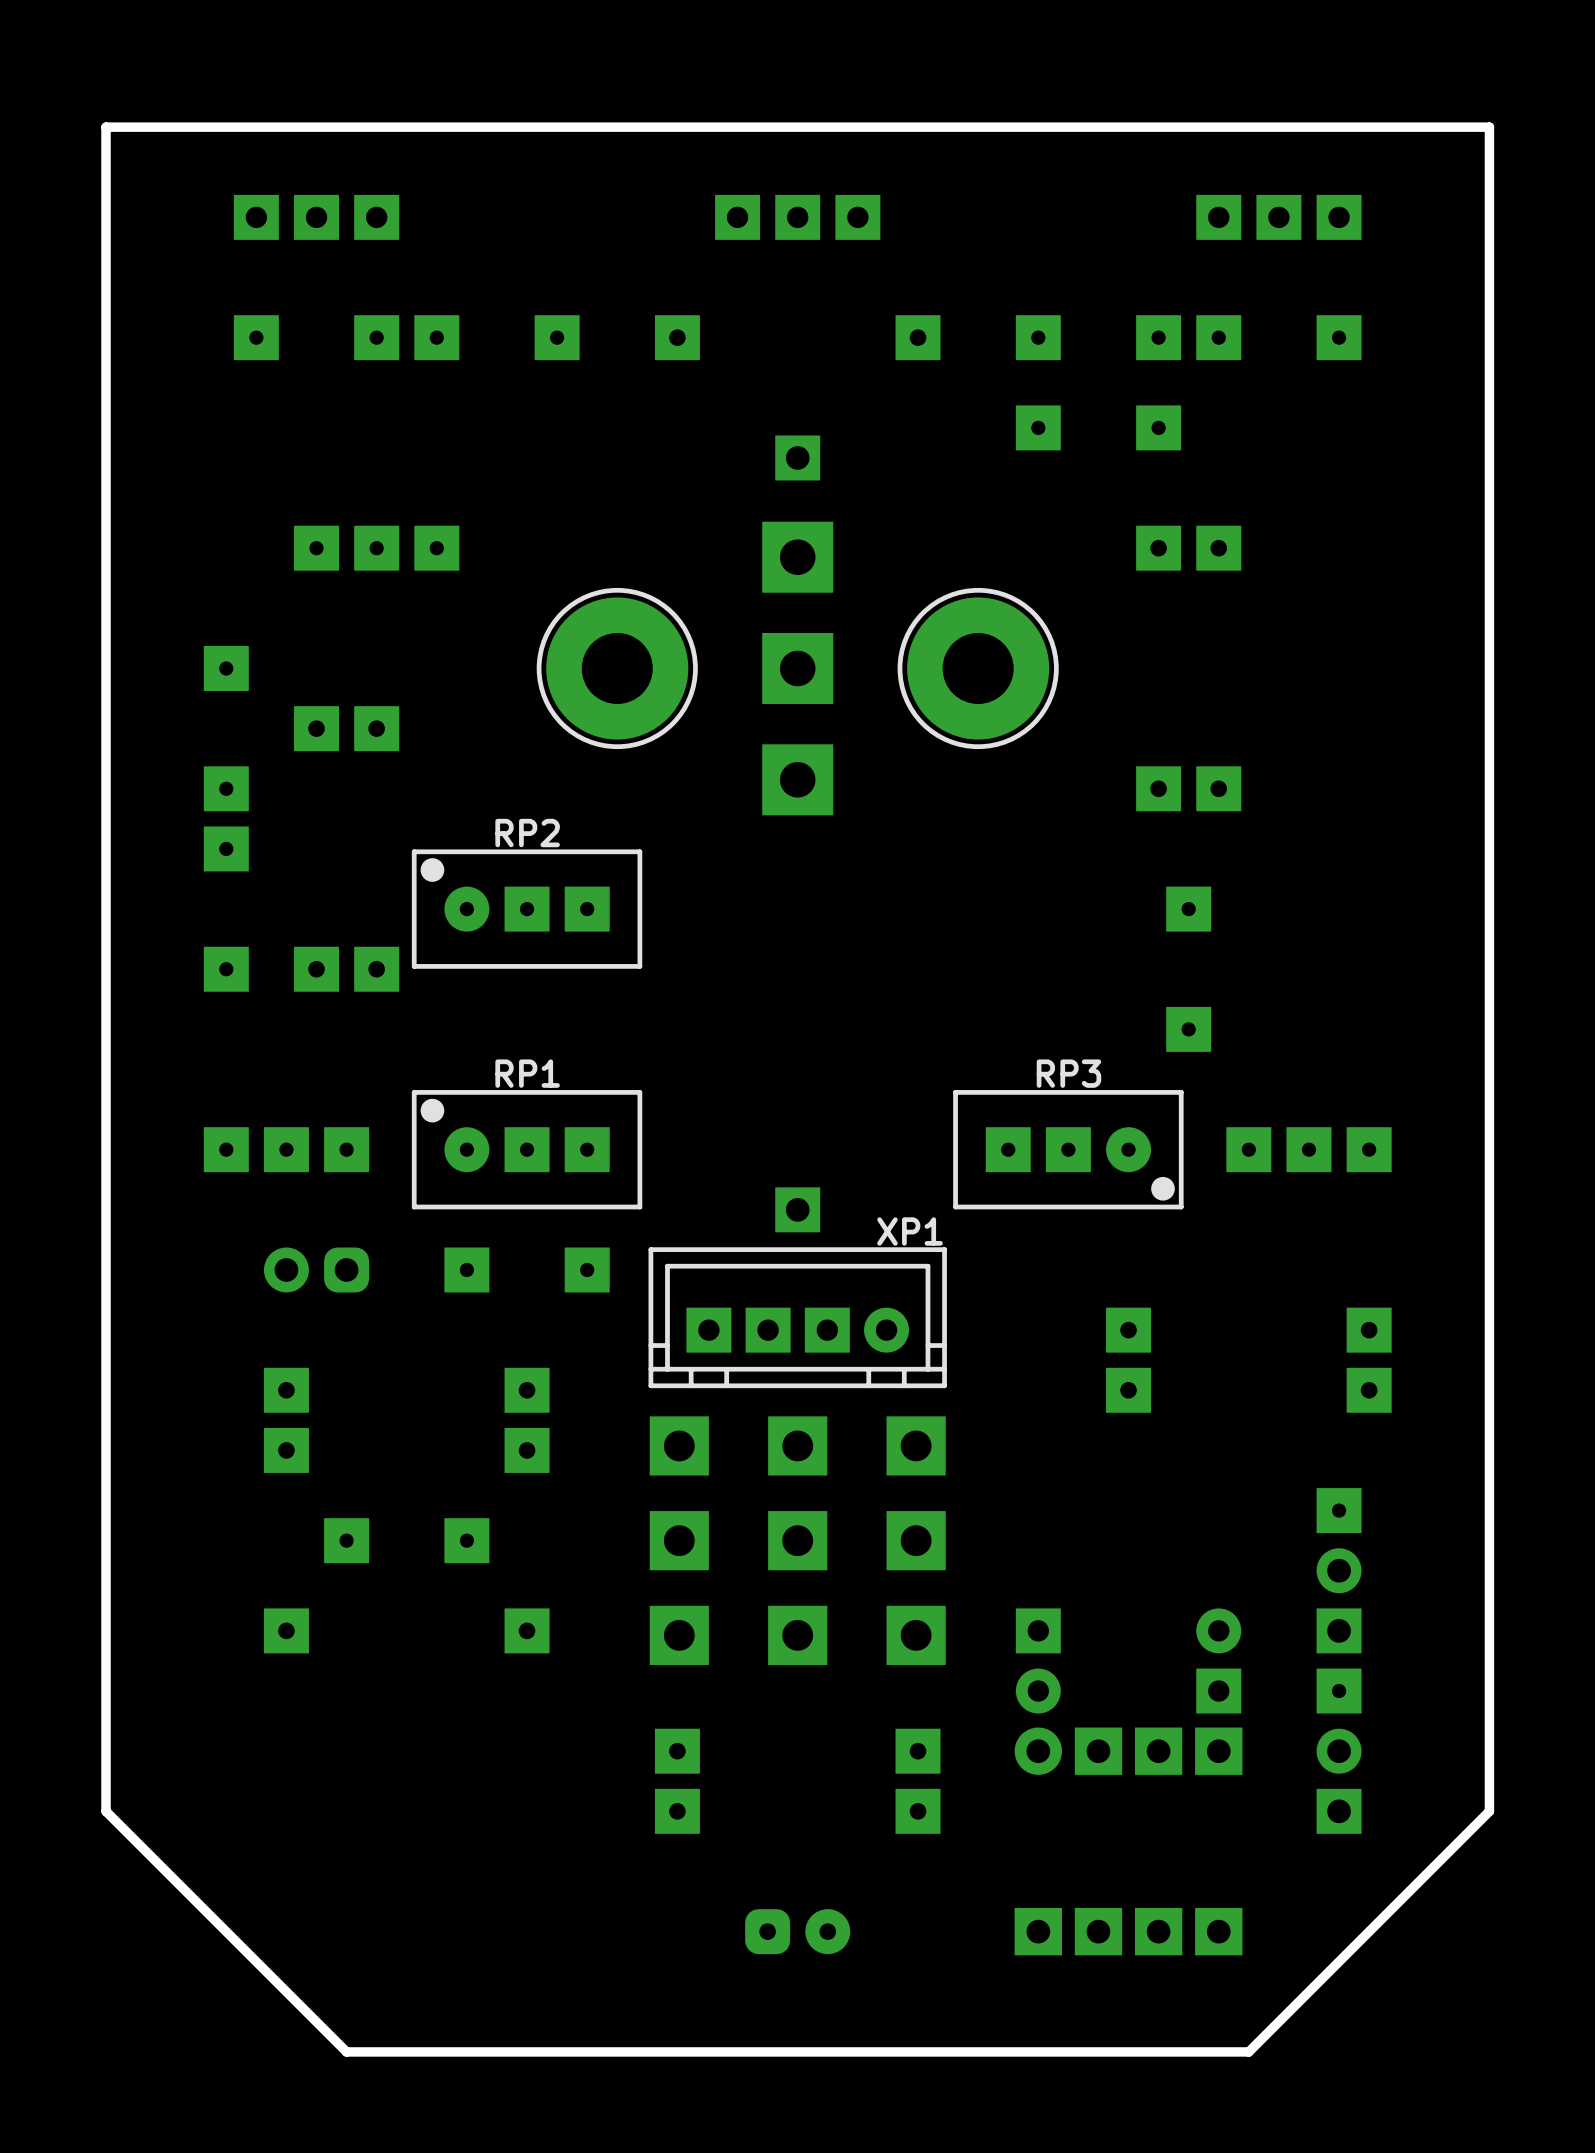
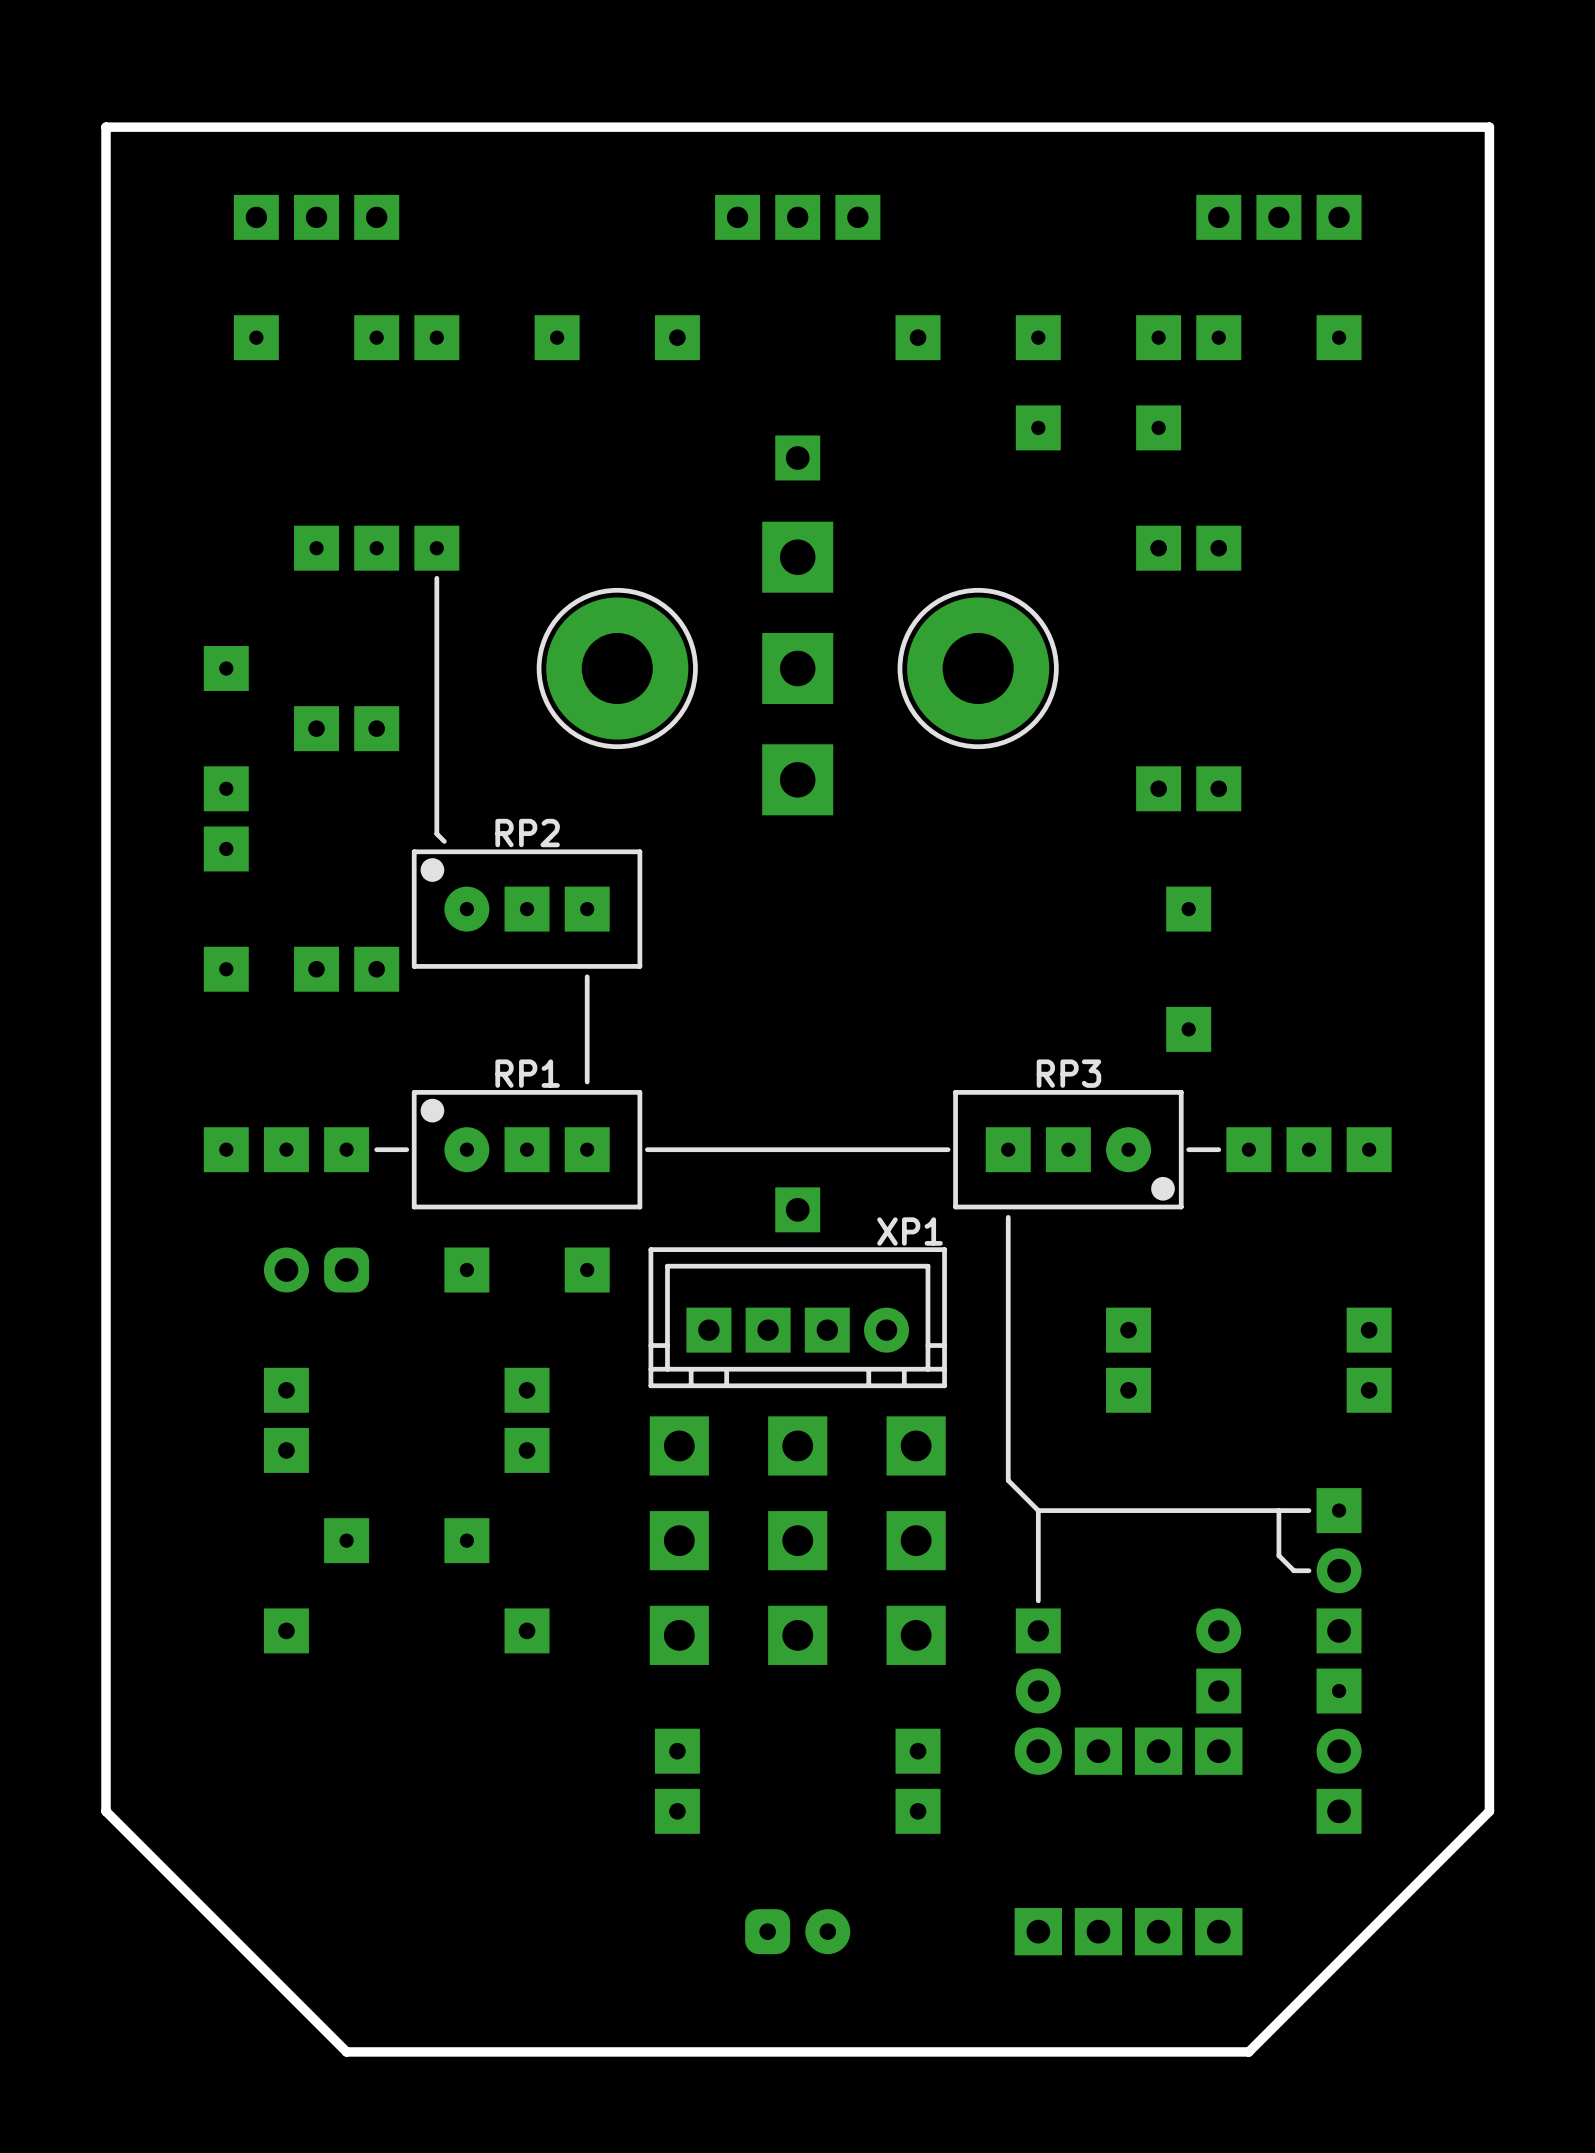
line: none -> (436, 578) (436, 833) (444, 841)
line: none -> (587, 976) (587, 1082)
line: none -> (406, 1149) (376, 1149)
line: none -> (948, 1149) (647, 1149)
line: none -> (1218, 1149) (1188, 1149)
line: none -> (1008, 1217) (1008, 1480) (1038, 1510)
line: none -> (1038, 1510) (1038, 1600)
line: none -> (1278, 1510) (1278, 1555) (1293, 1570) (1308, 1570)
line: none -> (1308, 1510) (1038, 1510)

